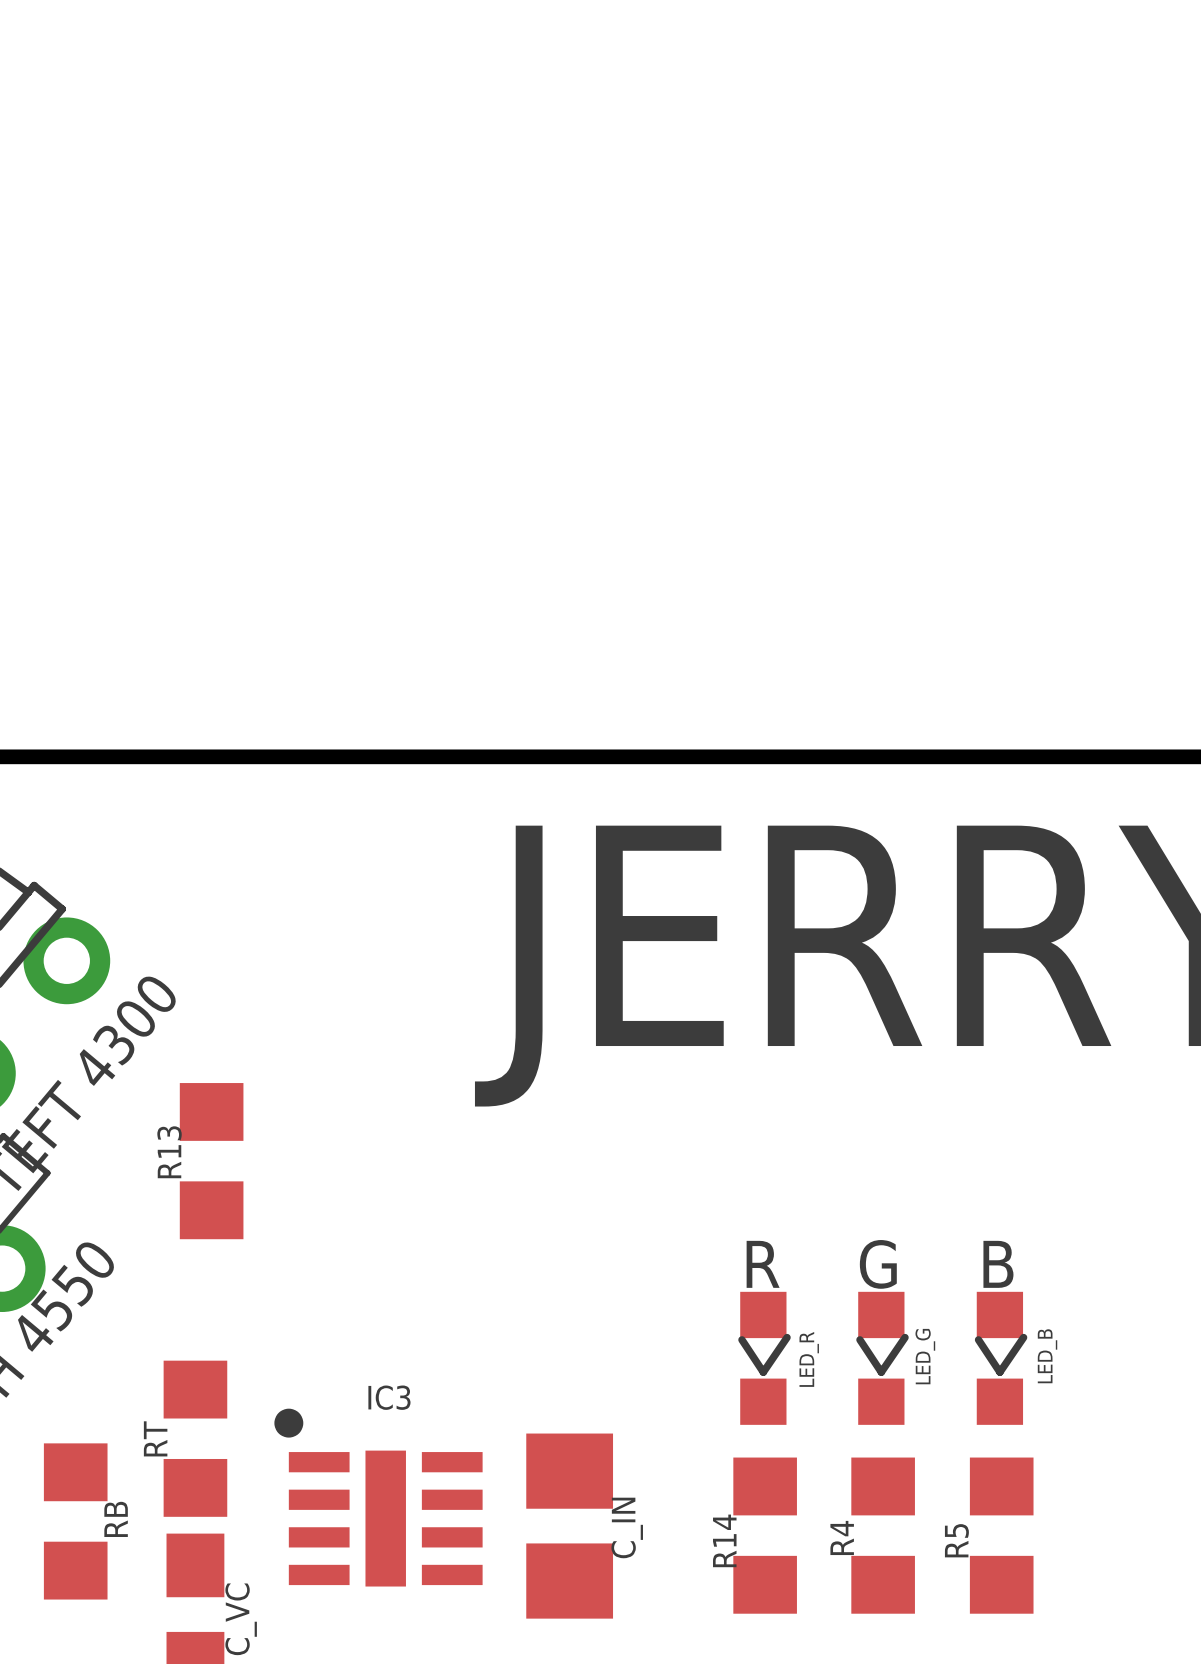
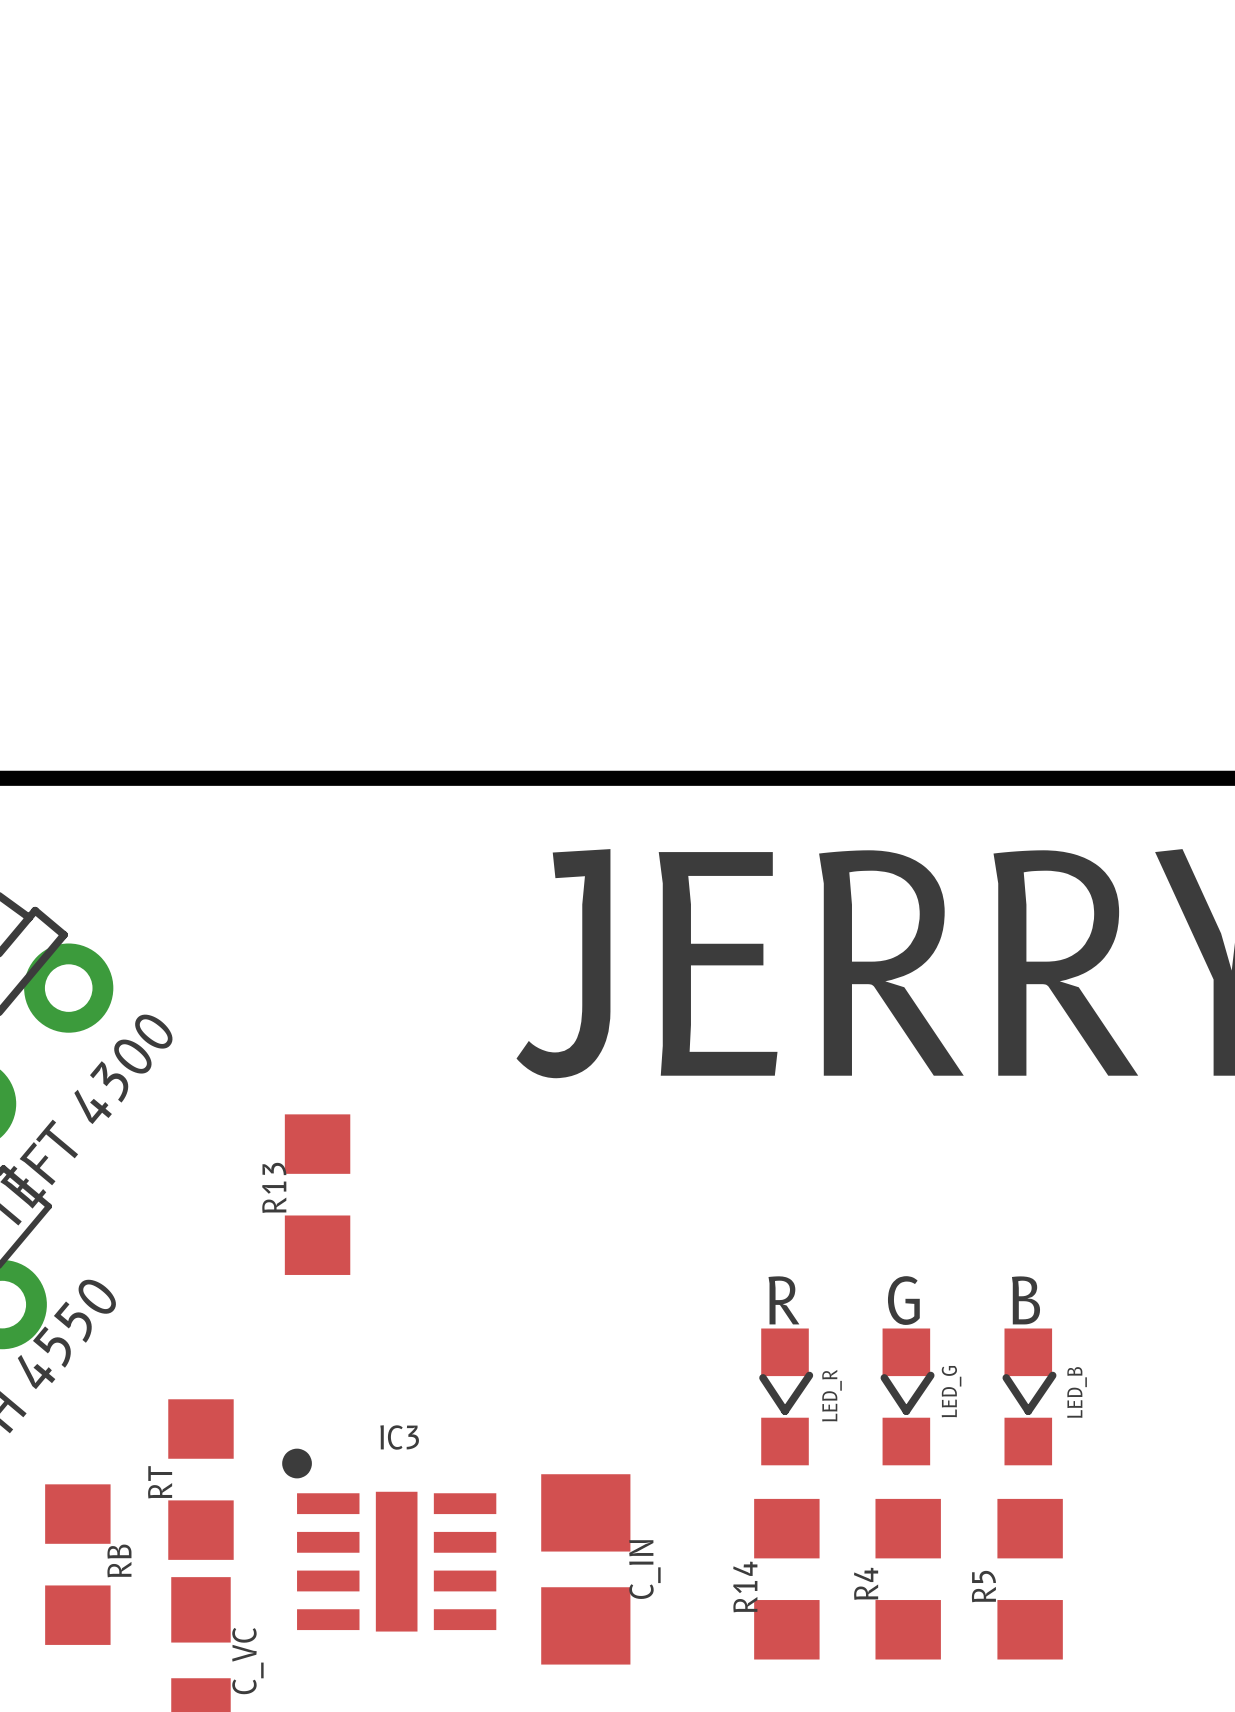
R13 position: (211, 1161) -> (317, 1194)

